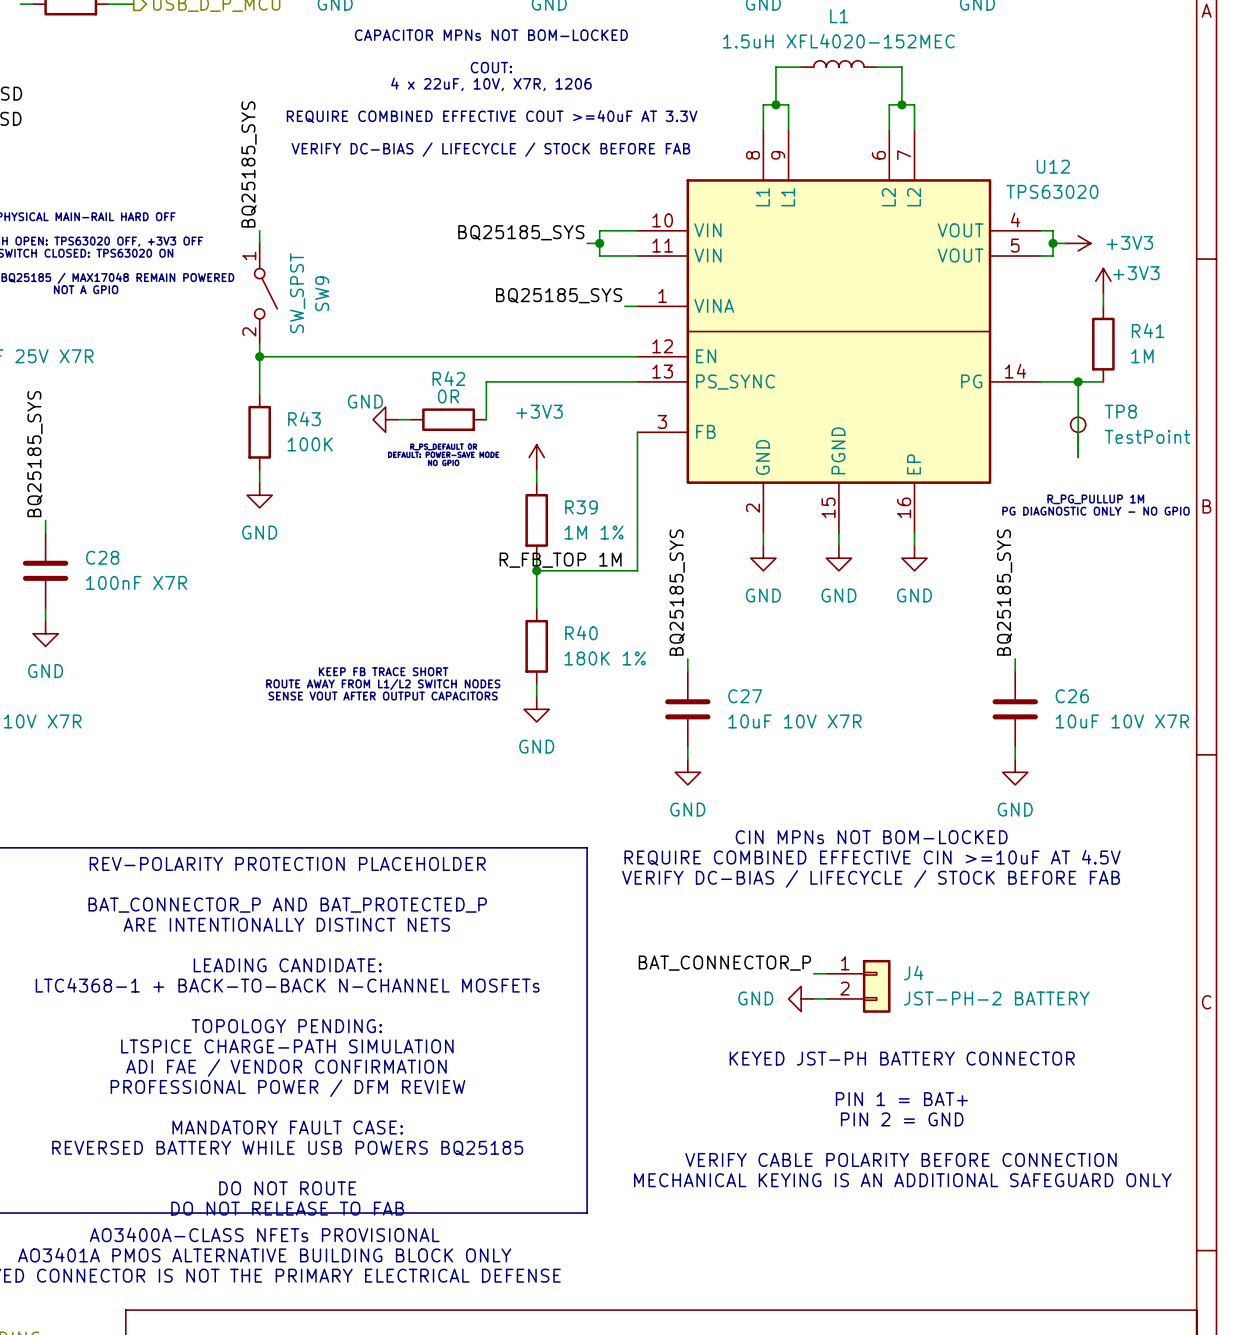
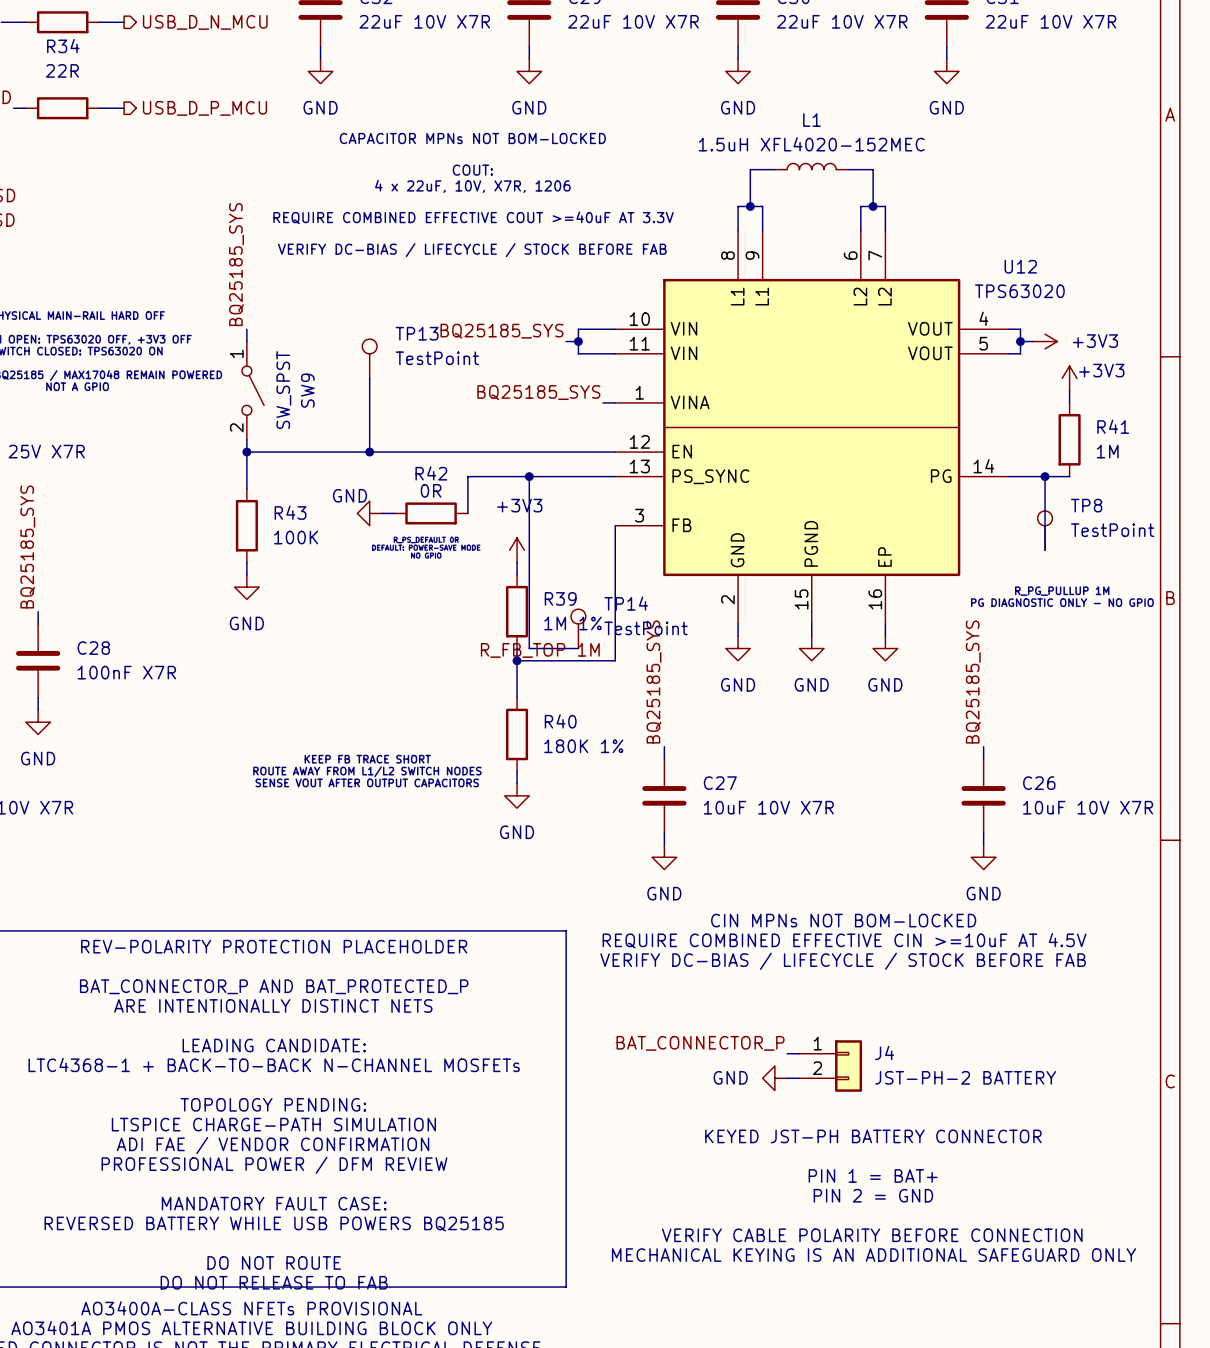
TP13: none -> TestPoint (369, 358)
wire: none -> (369, 378) (369, 452)
junction: none -> (369, 452)
wire: none -> (529, 476) (529, 648) (578, 648)
junction: none -> (529, 476)
TP14: none -> TestPoint (578, 628)

